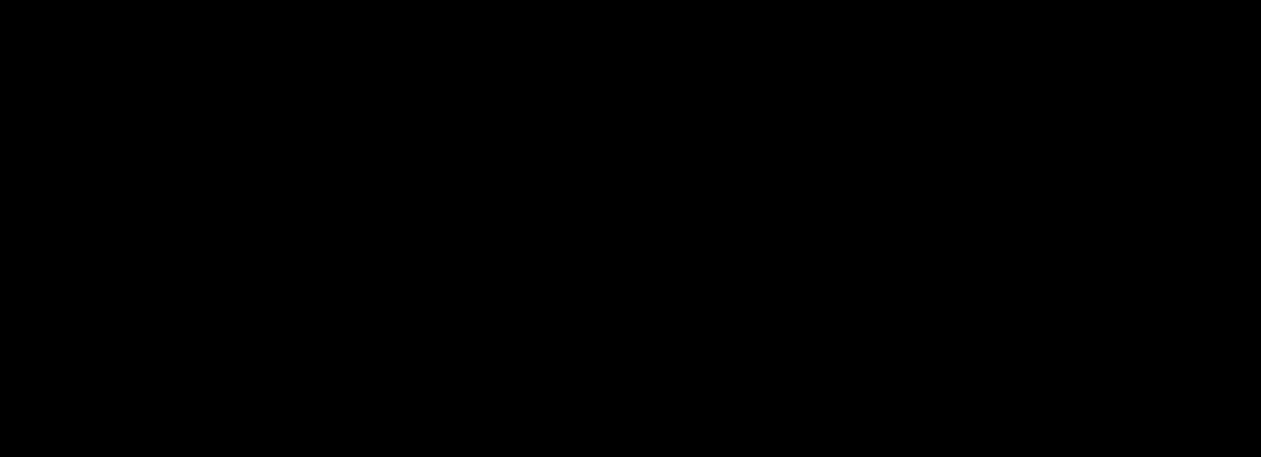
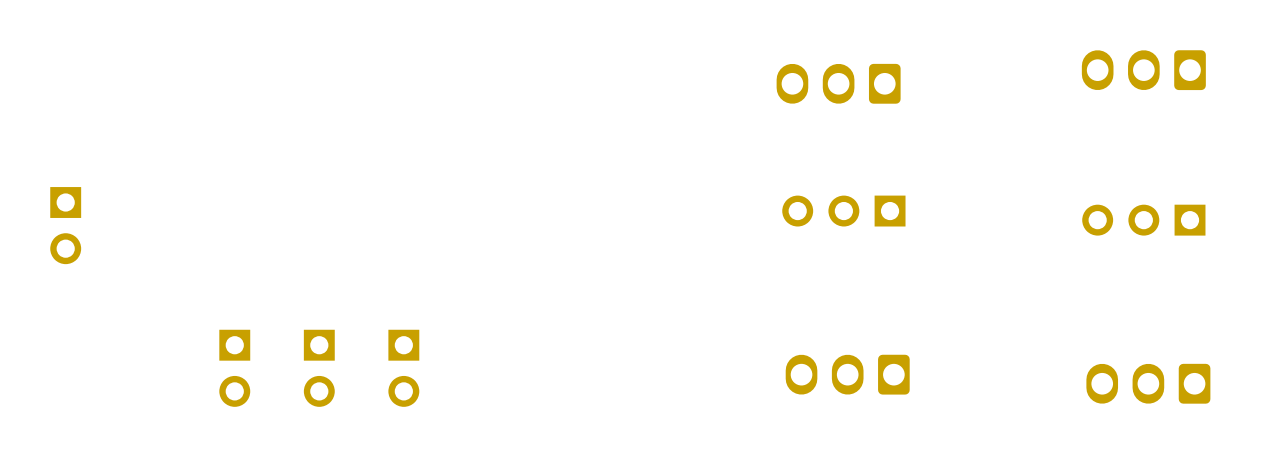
part: none -> (1143, 70)
part: none -> (838, 83)
part: none -> (843, 211)
part: none -> (1143, 220)
part: none -> (65, 225)
part: none -> (234, 368)
part: none -> (319, 368)
part: none -> (403, 368)
part: none -> (847, 374)
part: none -> (1148, 383)

